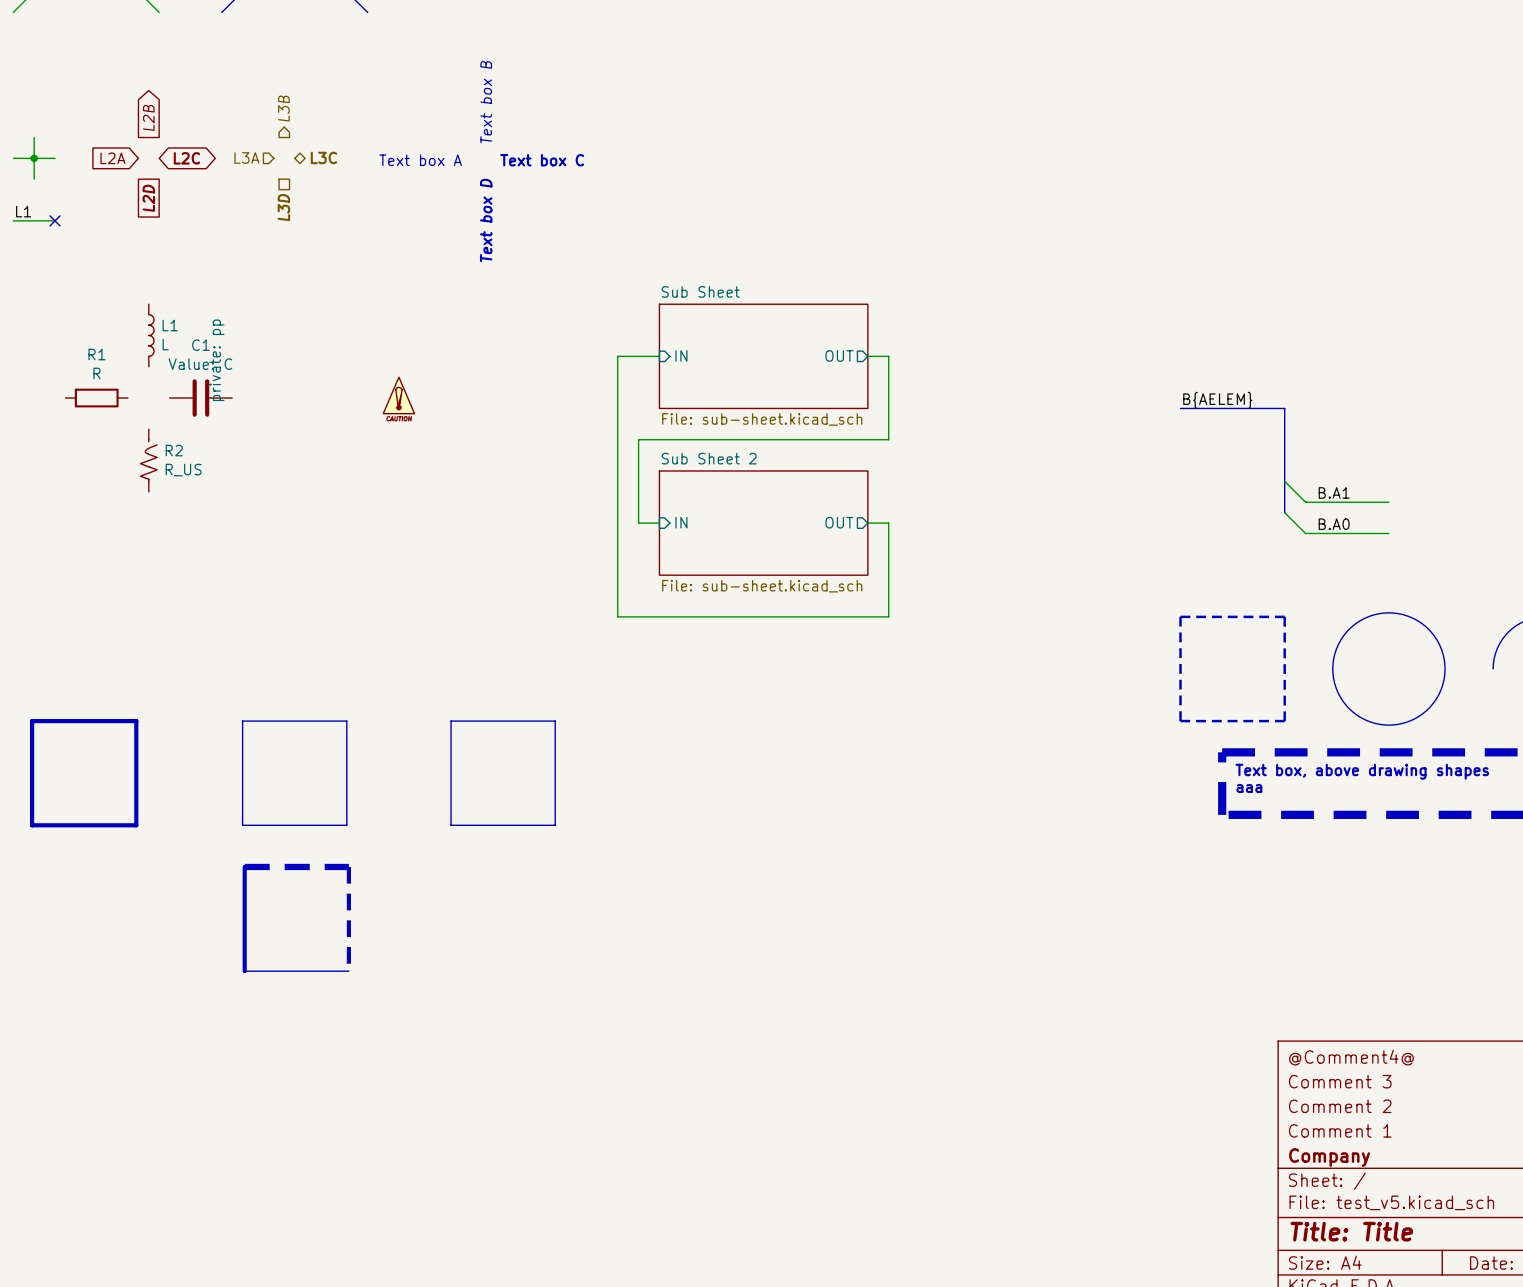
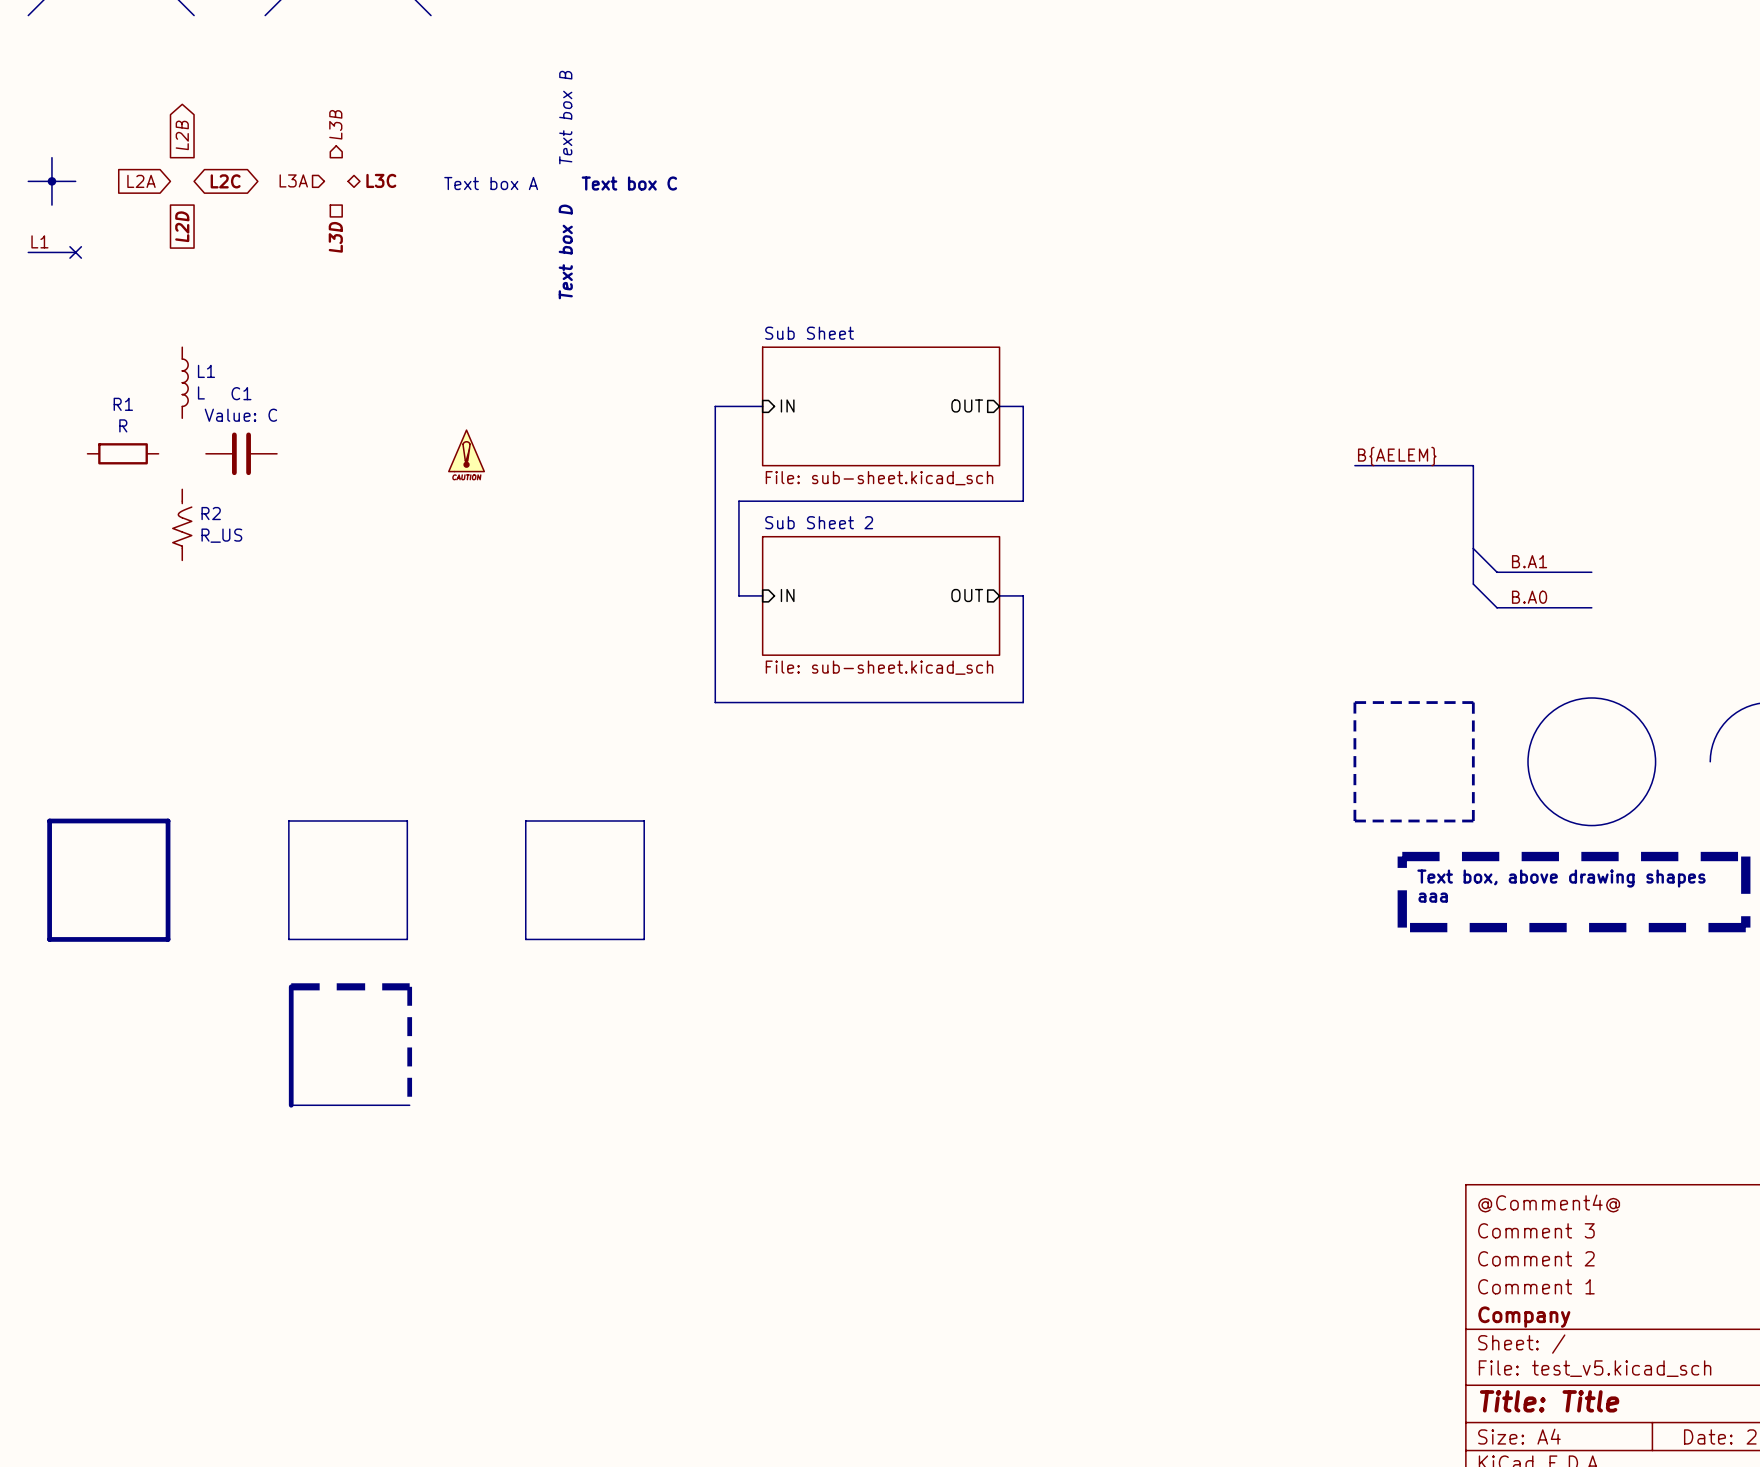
C1 text: private: pp (216, 360) -> none

